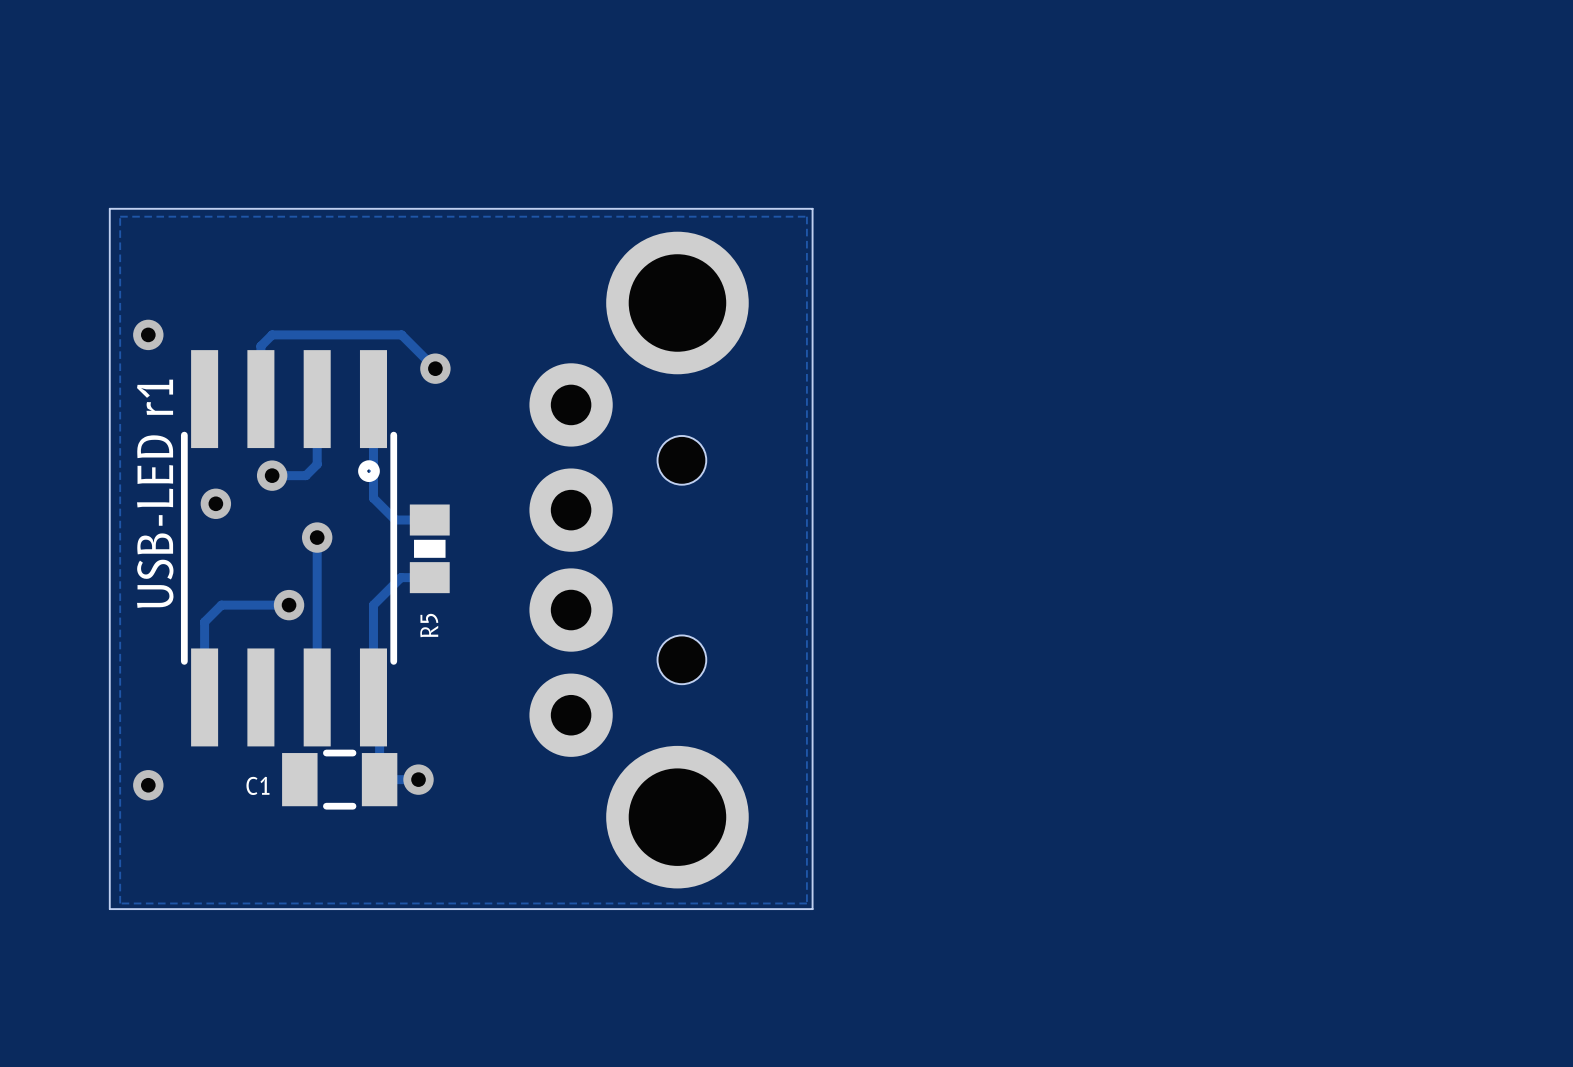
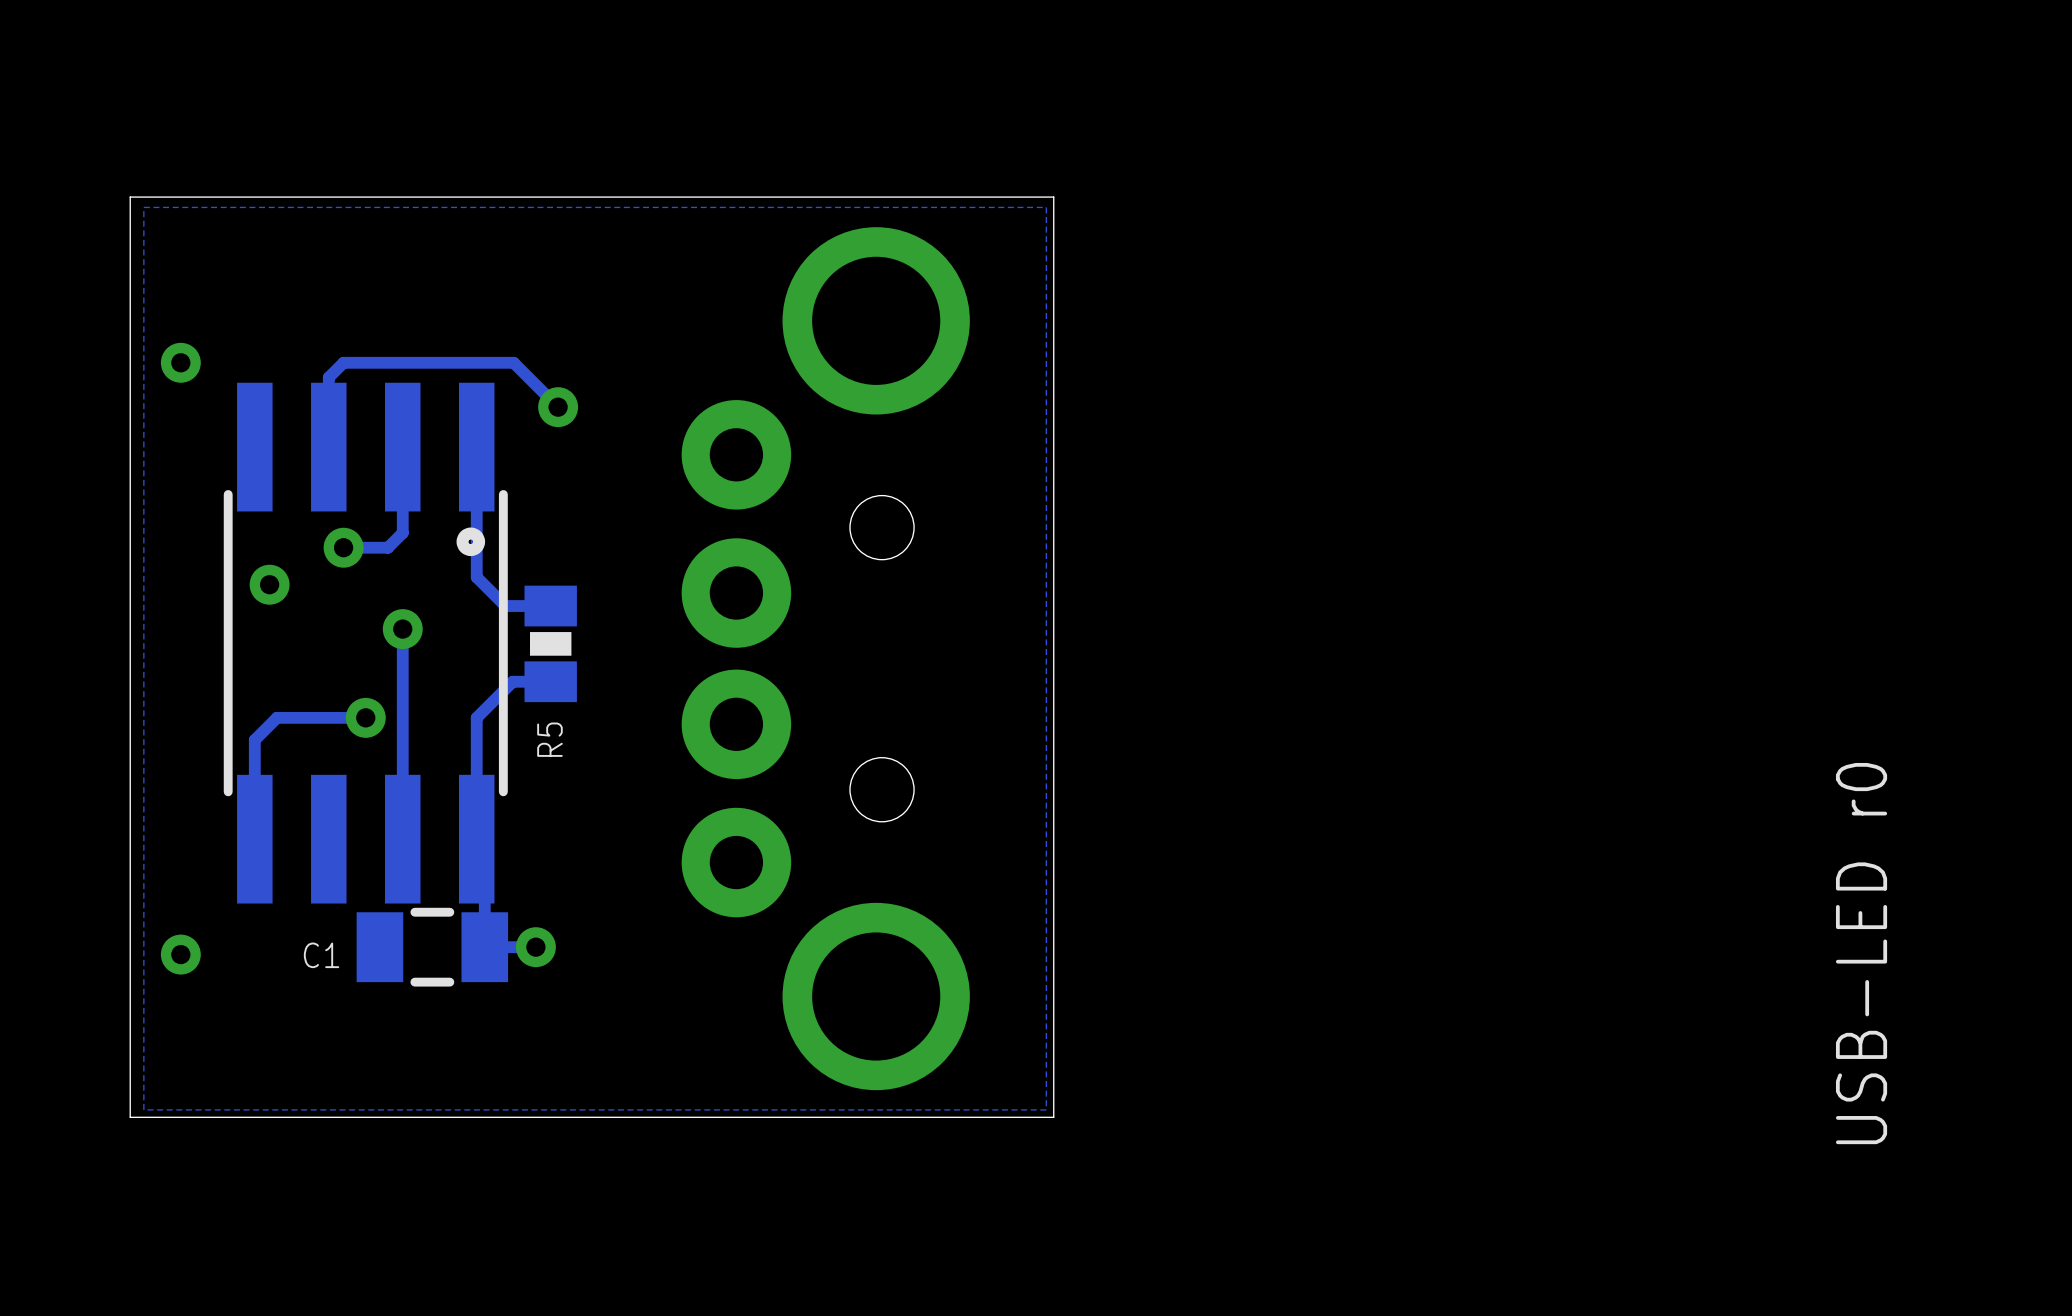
text: USB-LED r1 (155, 493) -> none
text: none -> USB-LED r0 (1861, 953)

